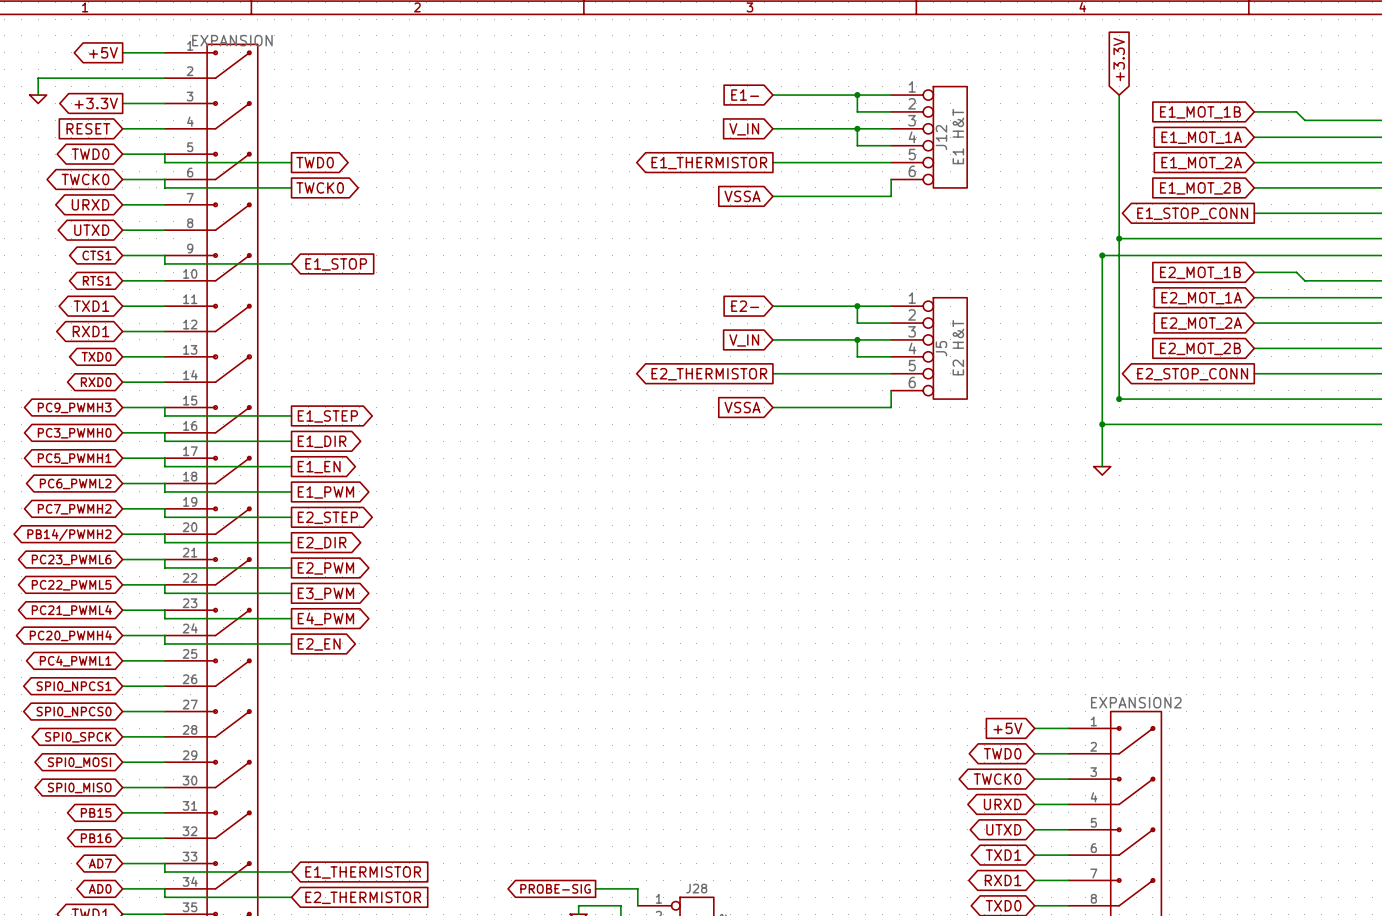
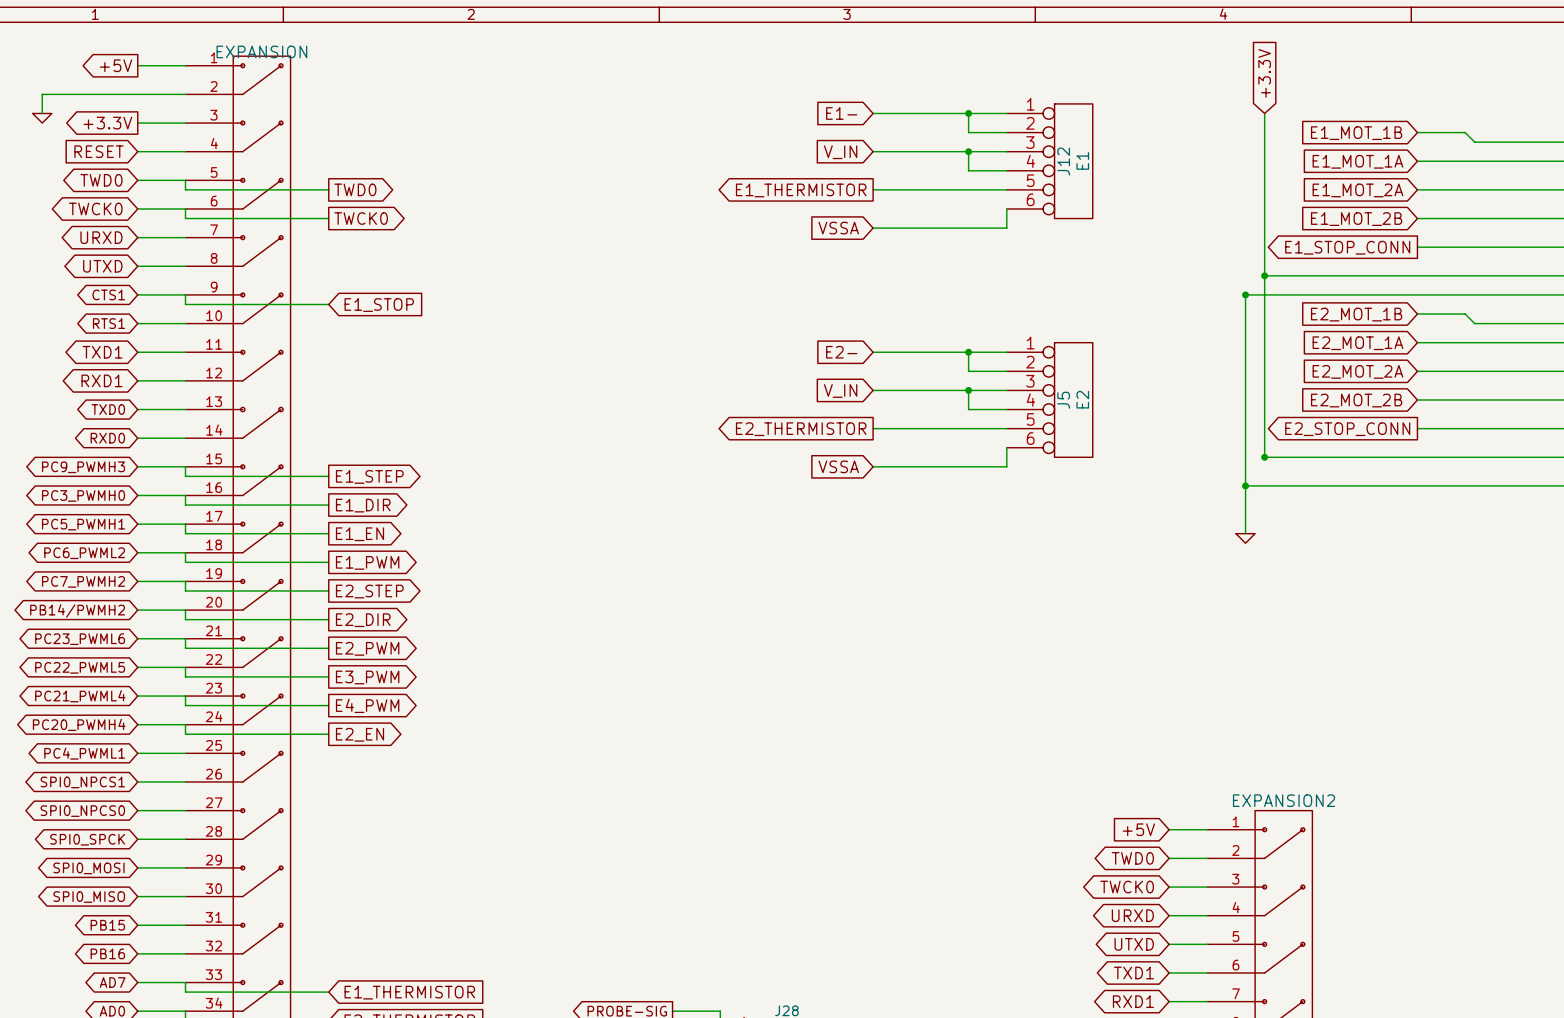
J12 value: E1 H&T (958, 136) -> E1 (1082, 160)
J5 value: E2 H&T (958, 347) -> E2 (1082, 399)

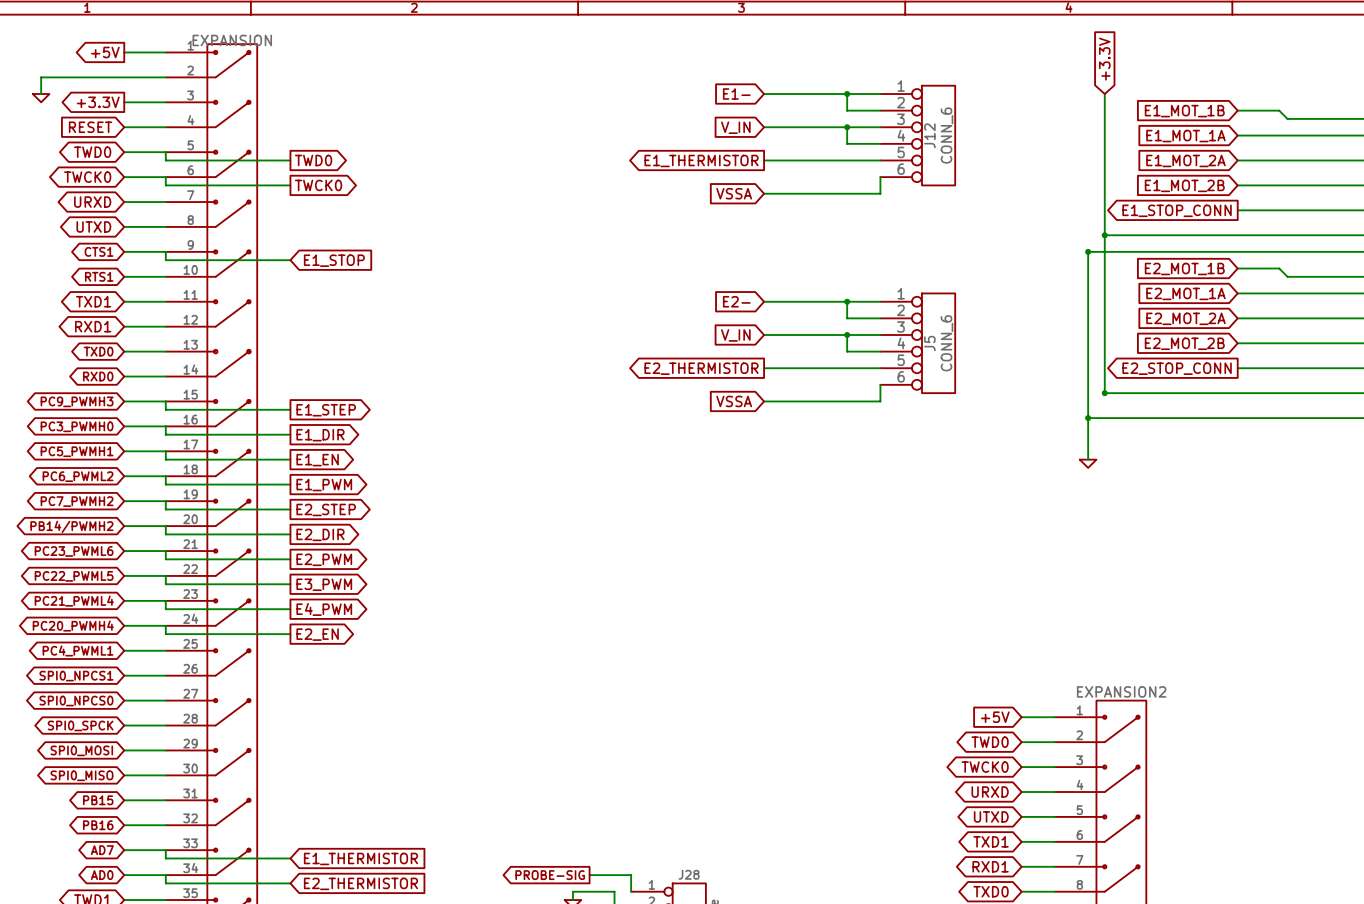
J12 value: E1 (1082, 160) -> CONN_6 (946, 135)
J5 value: E2 (1082, 399) -> CONN_6 (946, 343)

